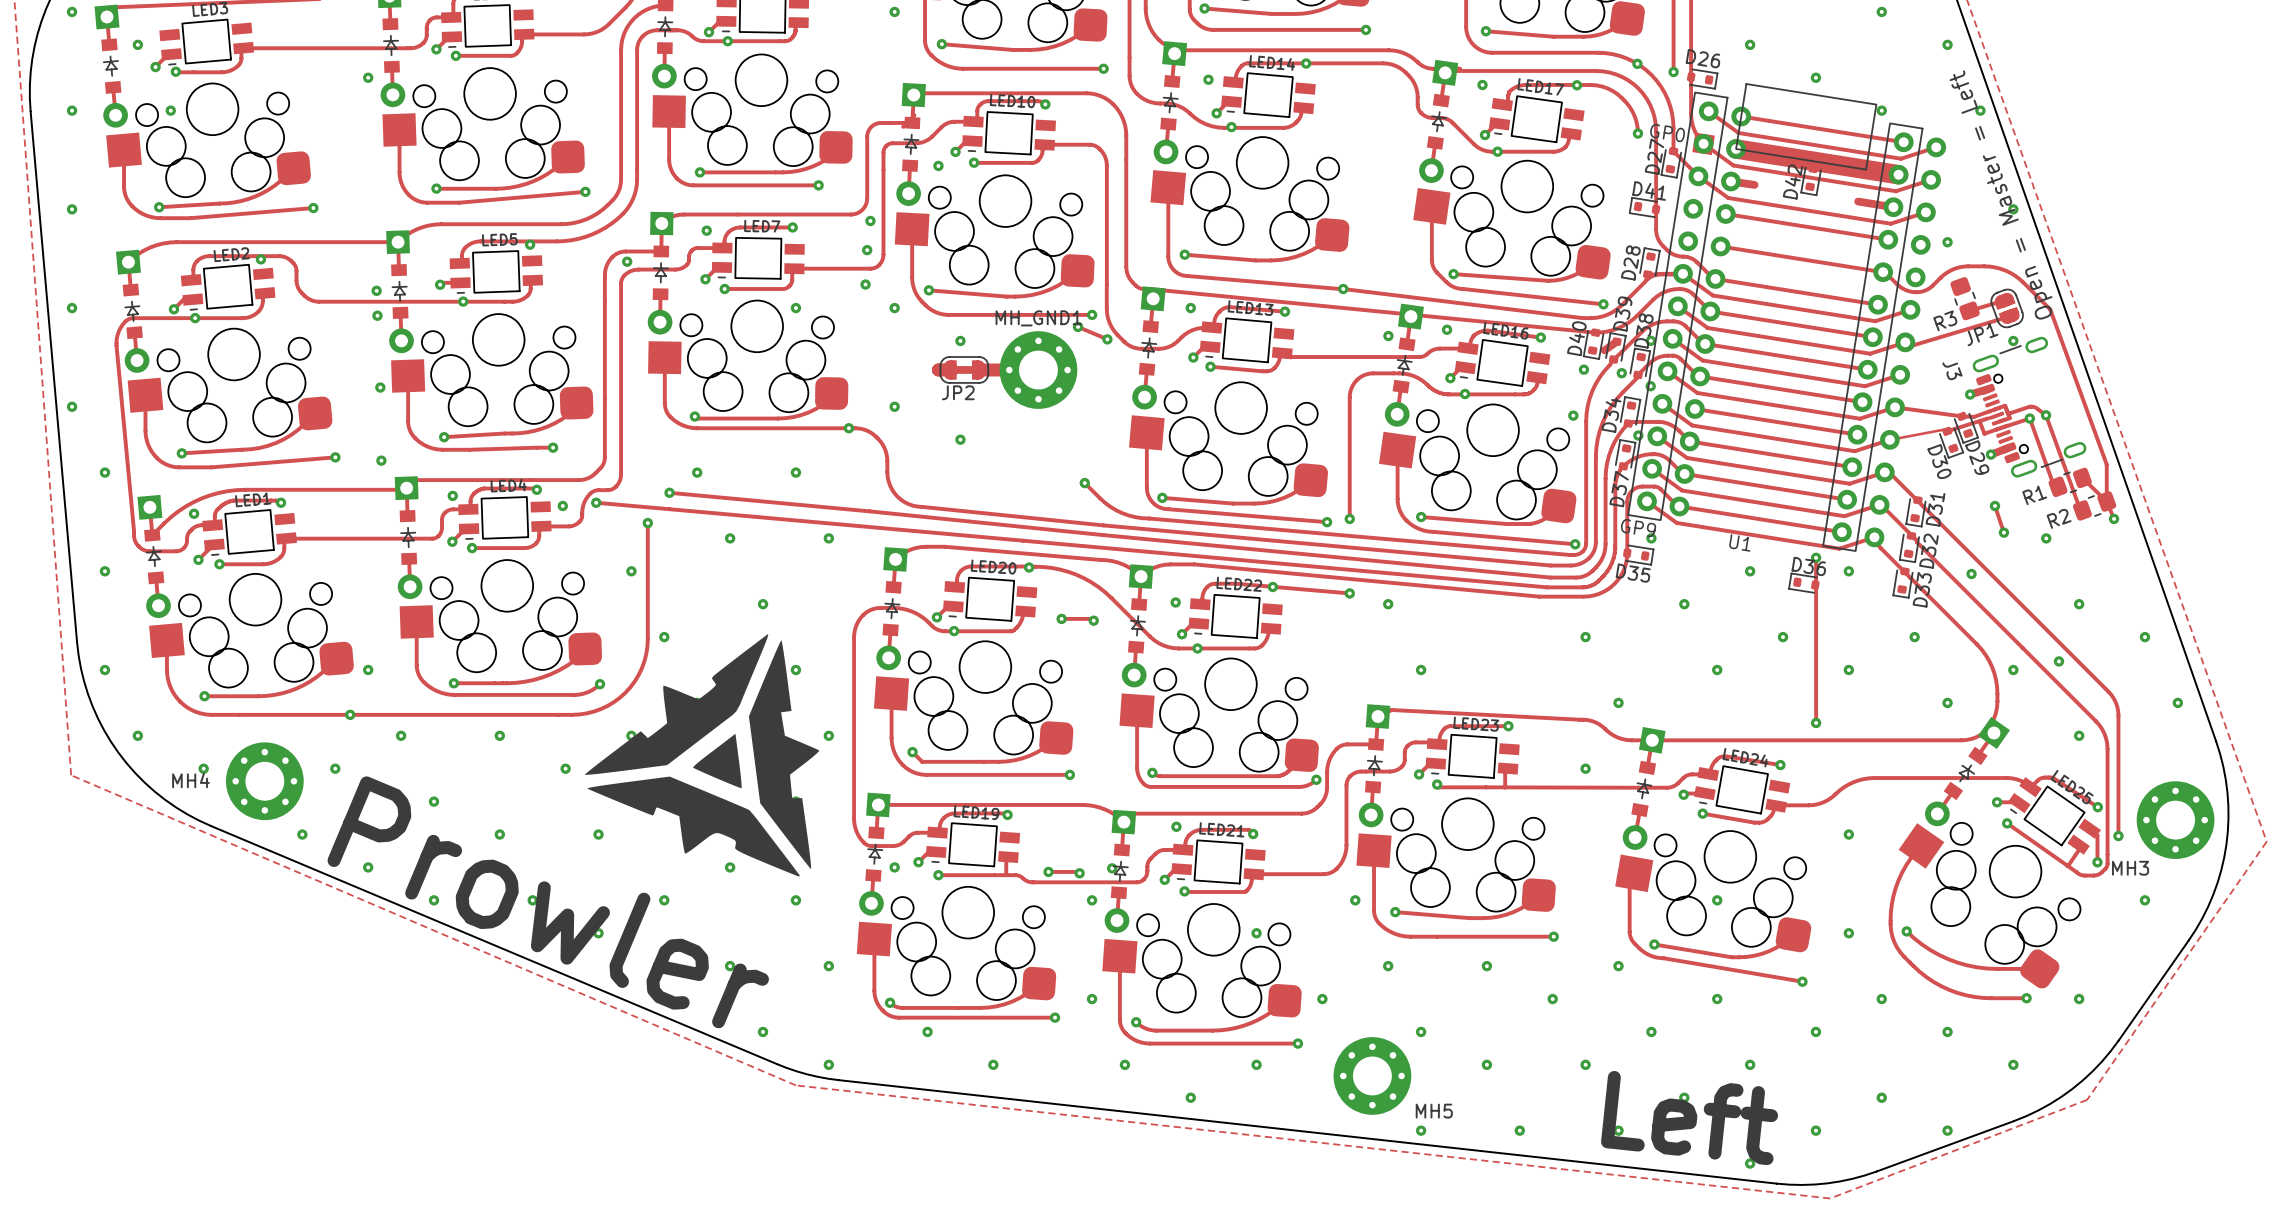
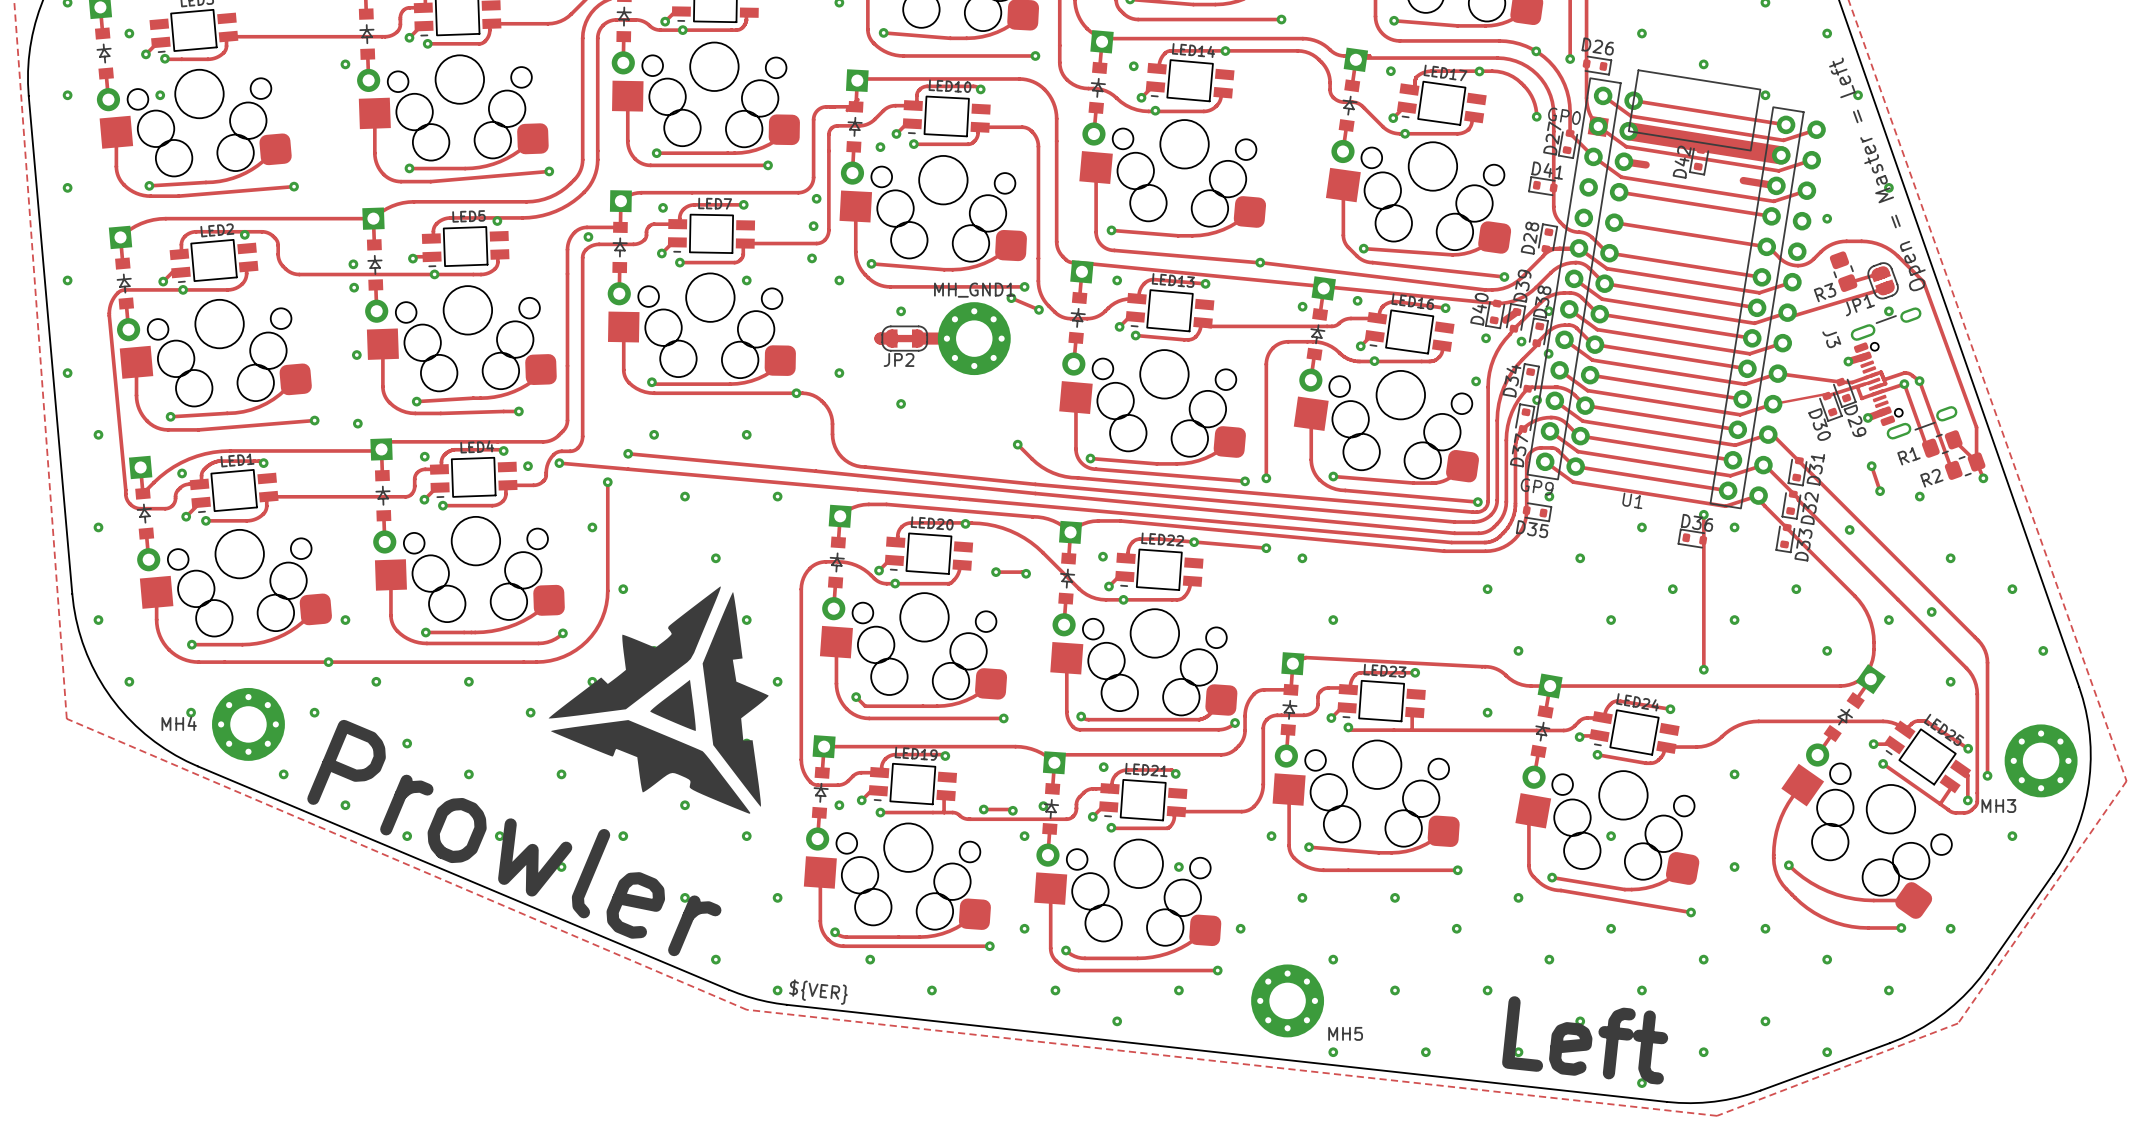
text: none -> ${VER} (818, 992)

